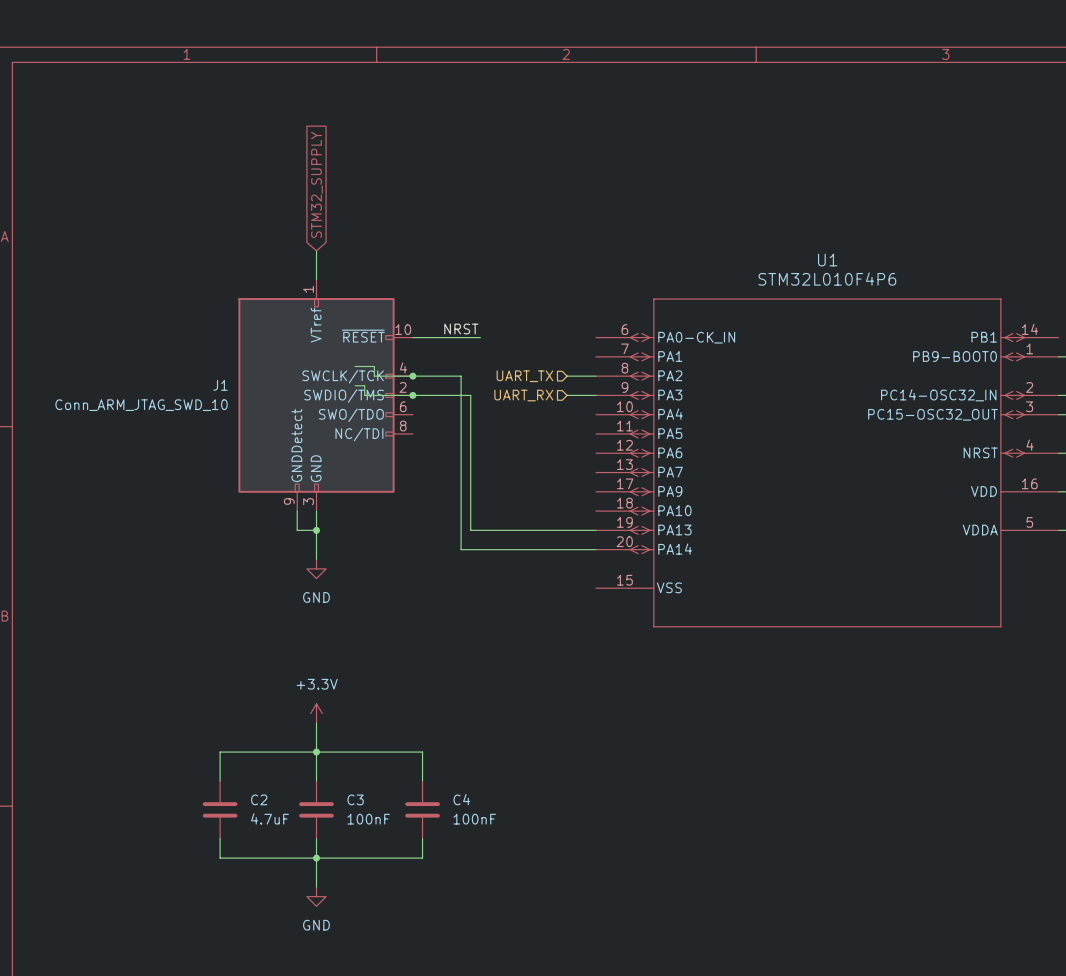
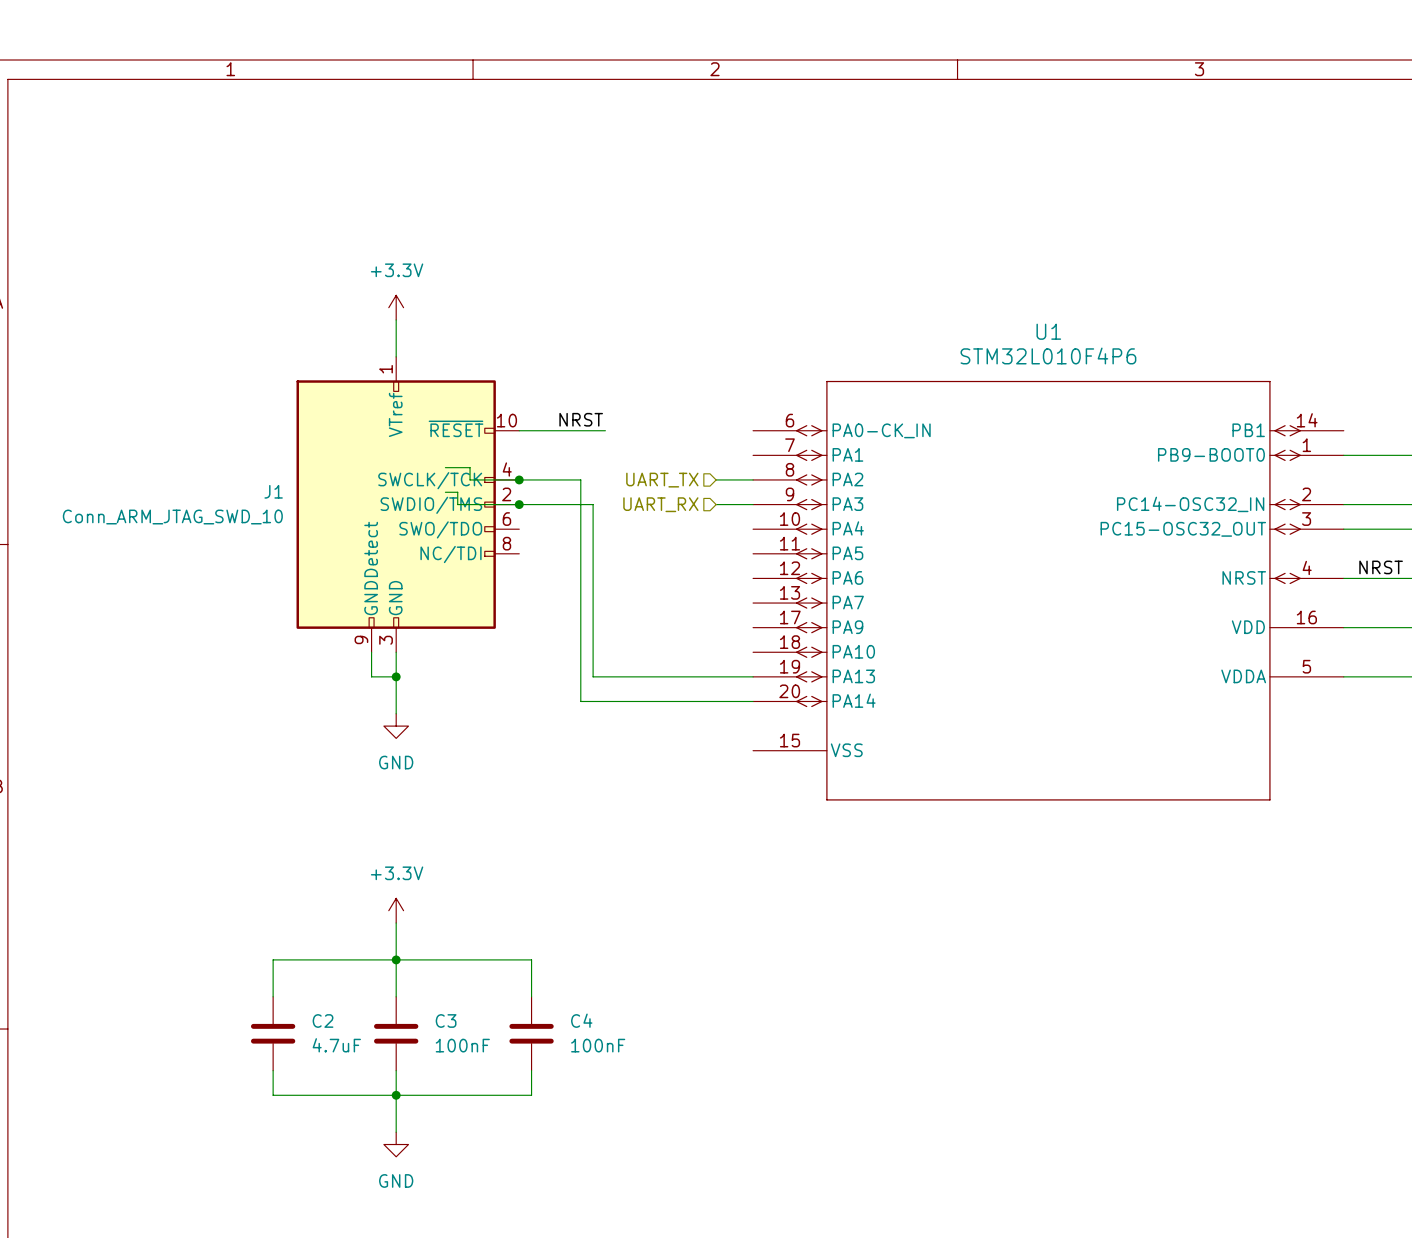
global label: STM32_SUPPLY (316, 184) -> none
power symbol: none -> +3.3V (396, 307)

